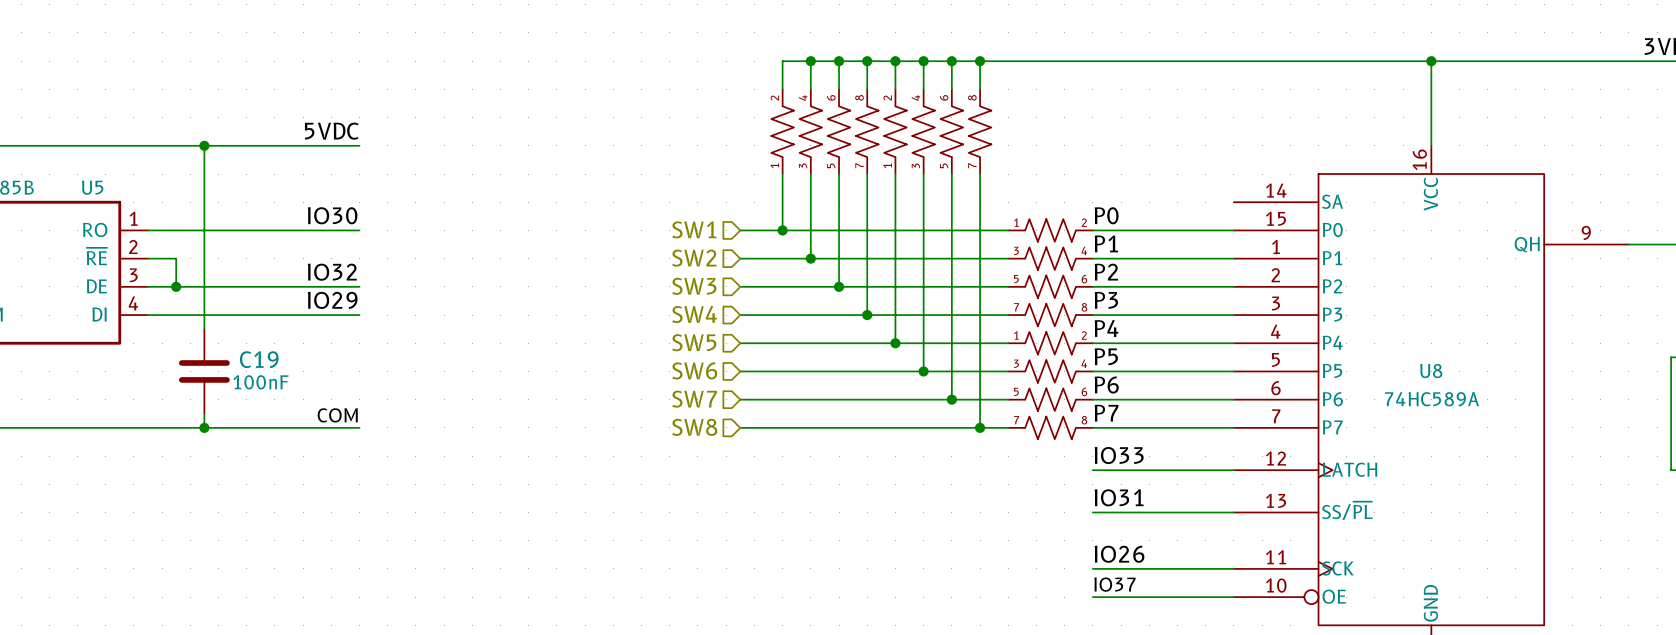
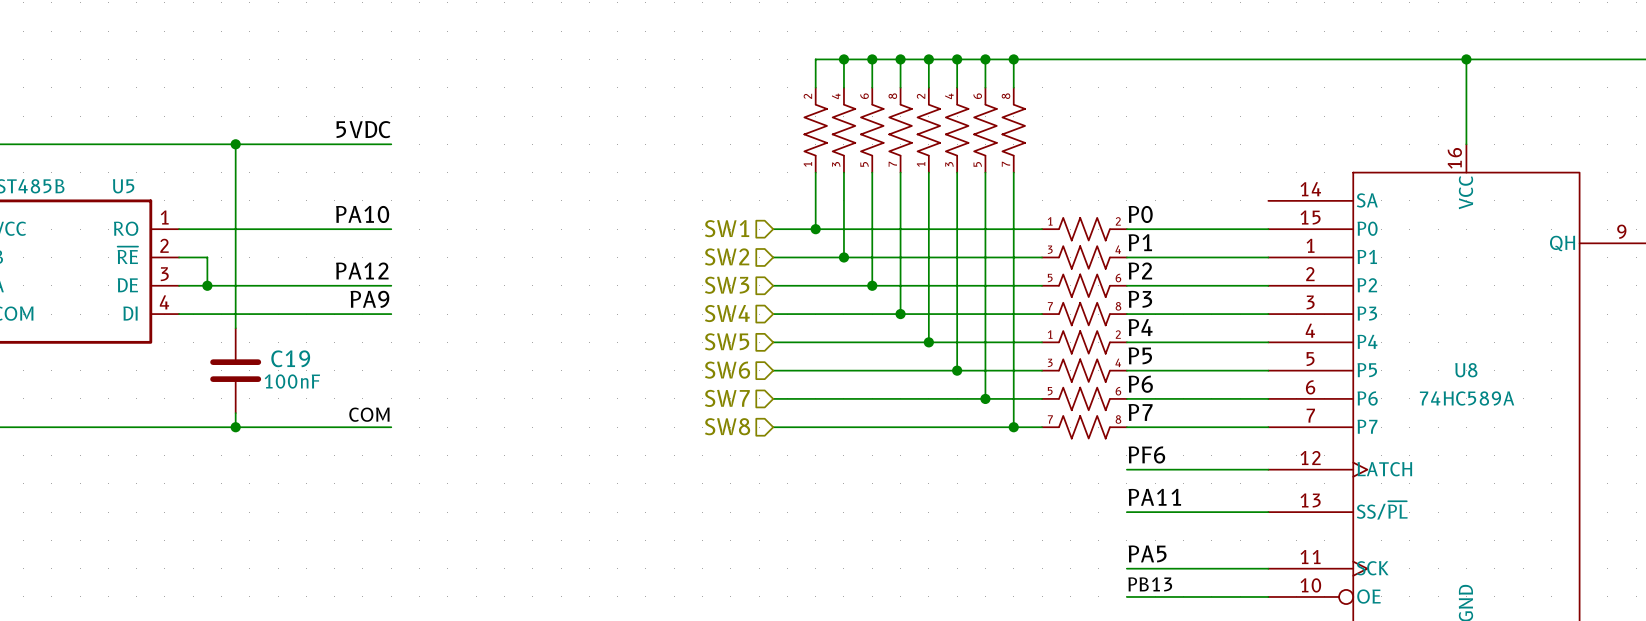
label: IO30 (332, 215) -> PA10 (362, 214)
label: IO32 (332, 272) -> PA12 (362, 270)
label: IO29 (332, 300) -> PA9 (369, 299)
label: IO33 (1119, 455) -> PF6 (1146, 454)
label: IO31 (1119, 497) -> PA11 (1154, 497)
label: IO26 (1119, 554) -> PA5 (1147, 553)
label: IO37 (1114, 584) -> PB13 (1150, 584)

